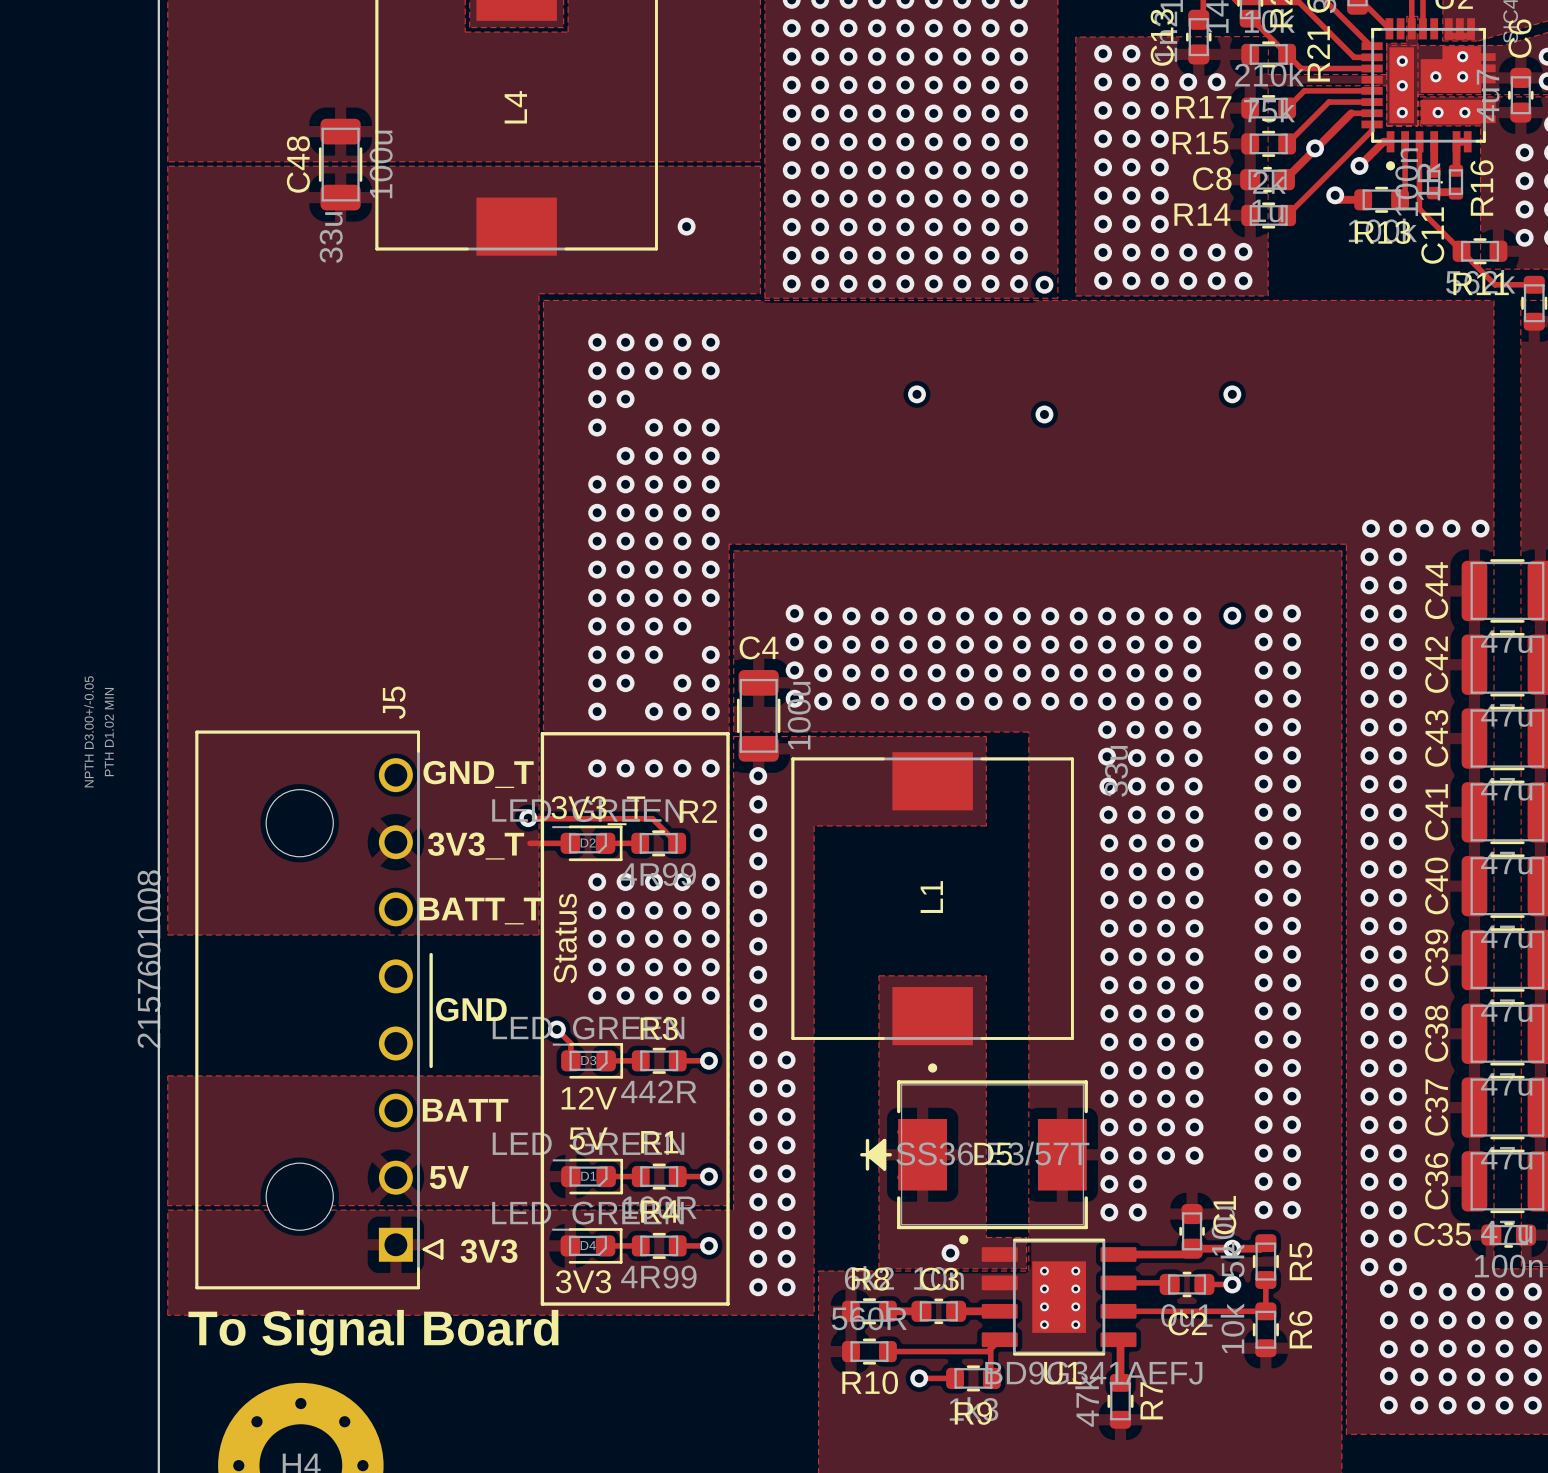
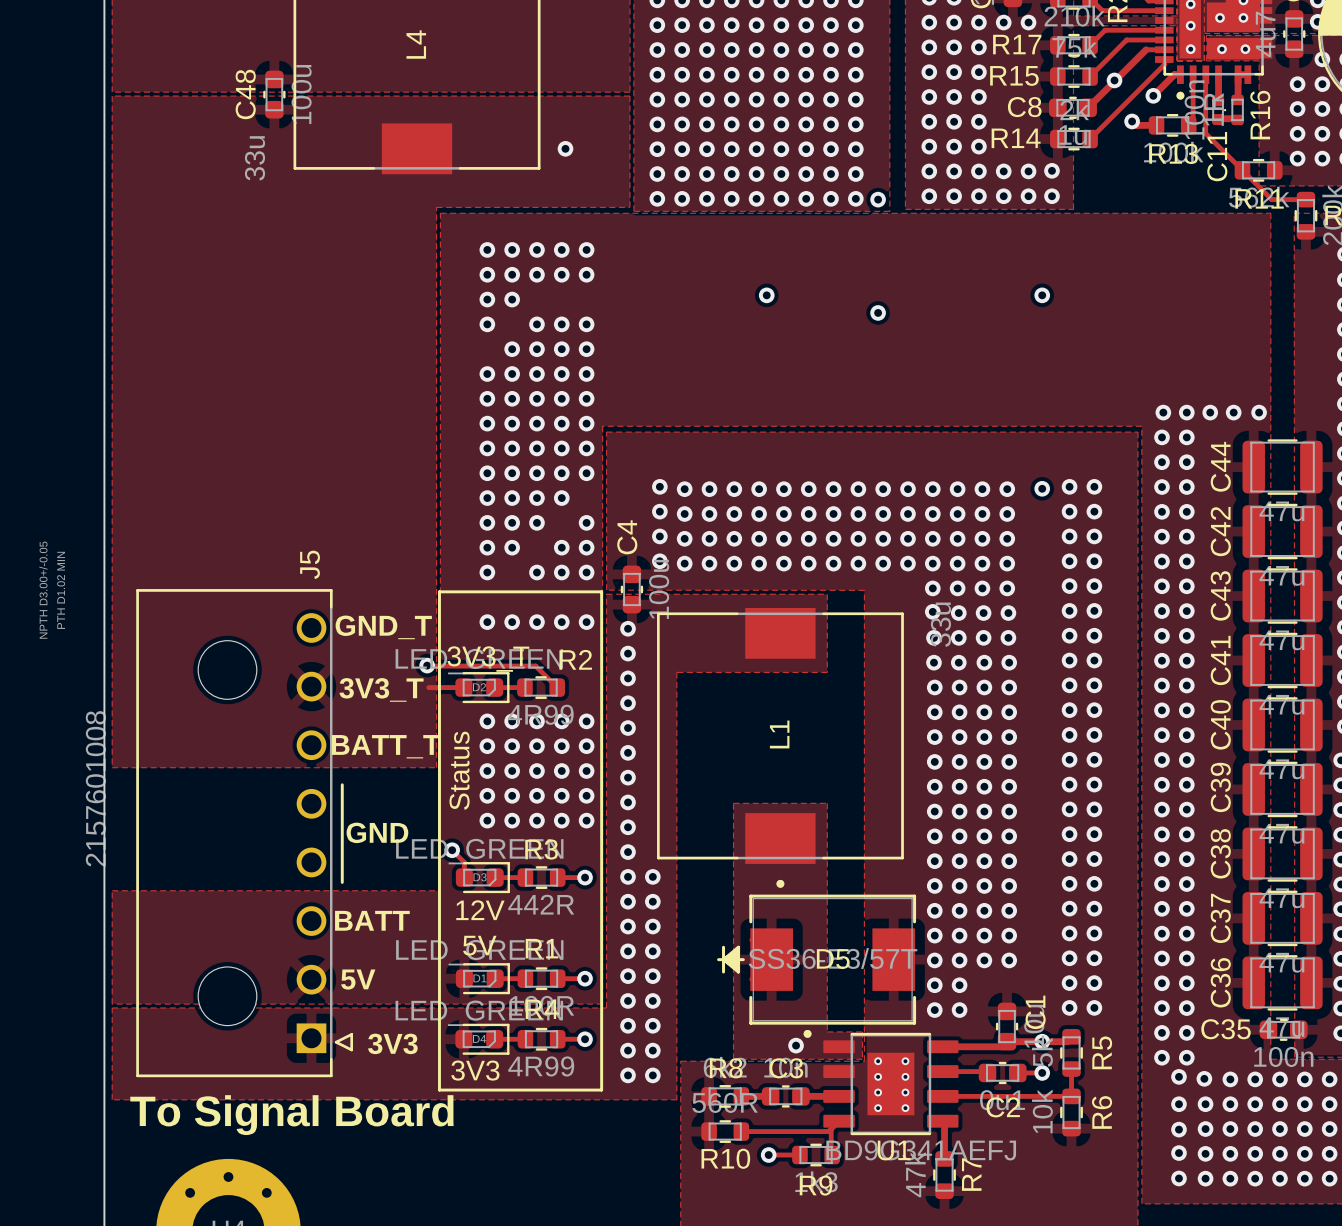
C48 footprint: [318, 118, 363, 211] -> [263, 70, 286, 119]
C4 footprint: [737, 669, 781, 762] -> [620, 565, 644, 614]

